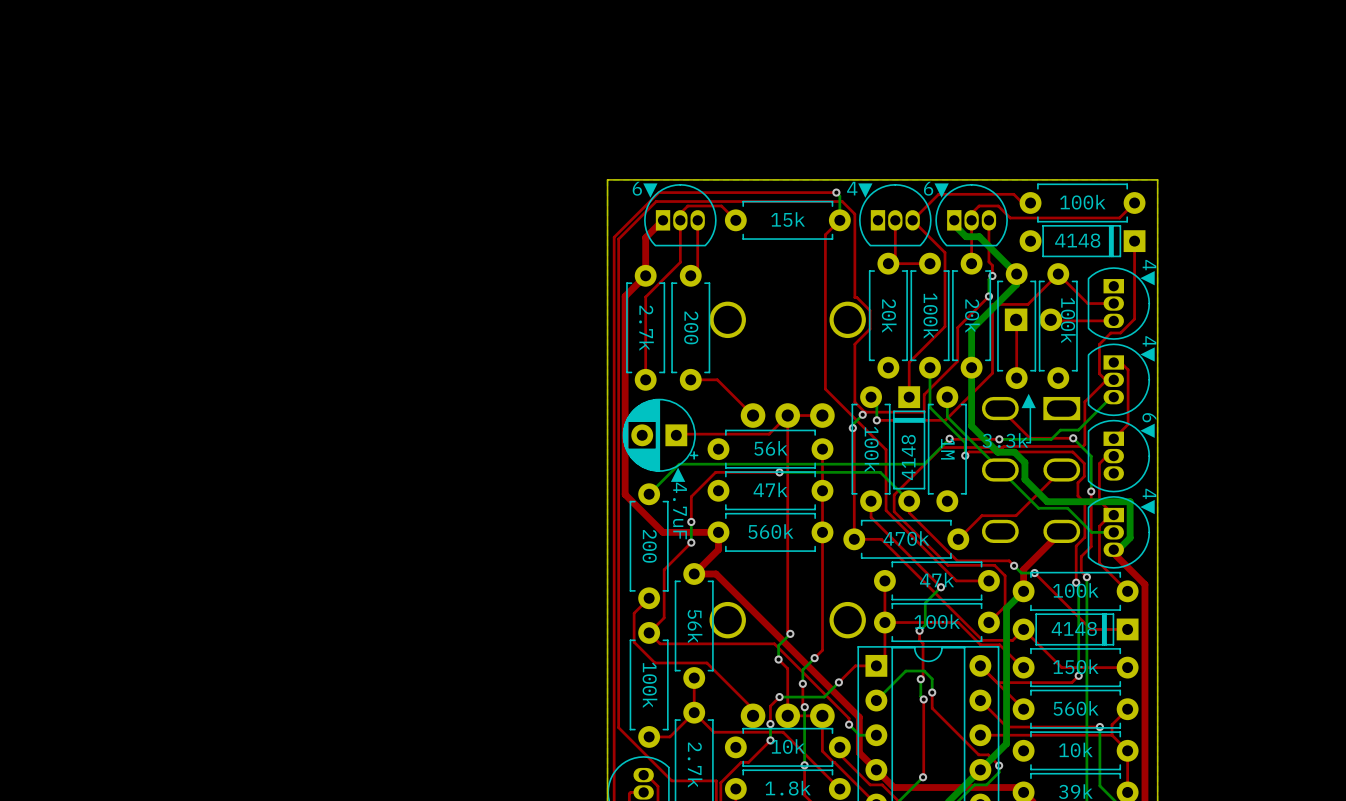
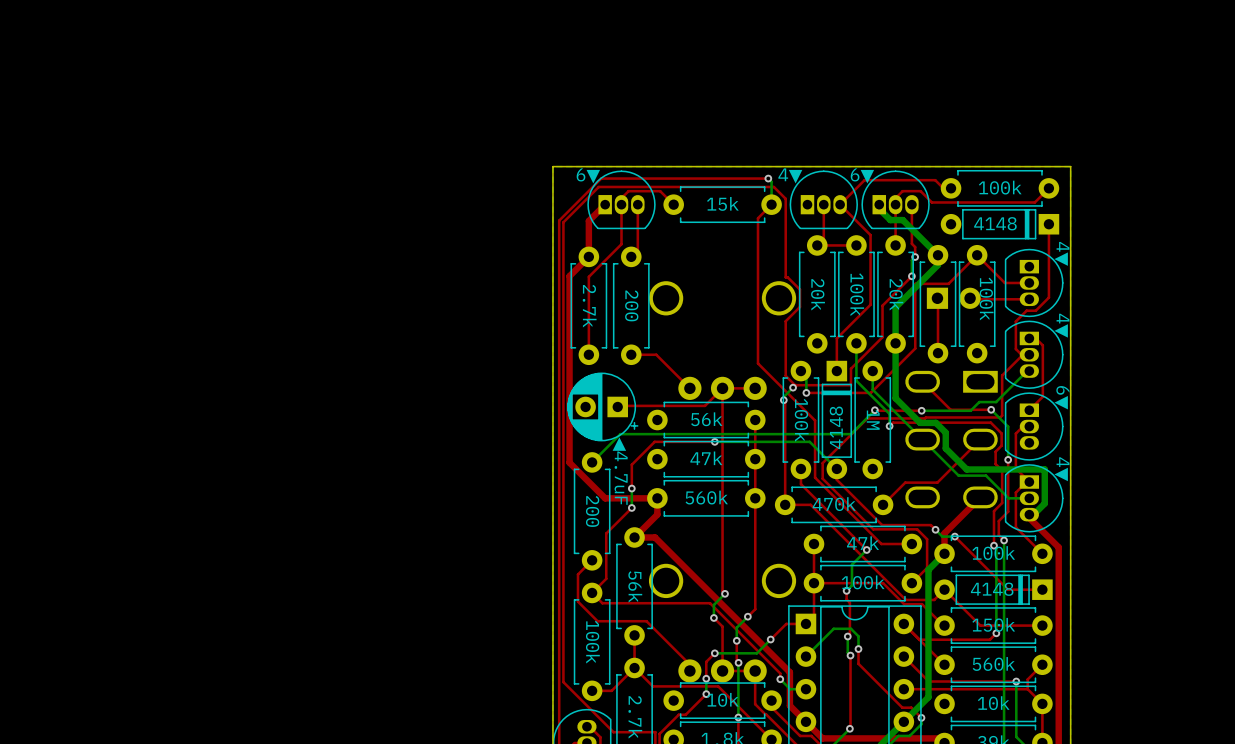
text: ▲ (1028, 400) -> none
line: (1030, 406) (1030, 442) (1026, 442) -> none
part value: 3.3k (1005, 440) -> none

